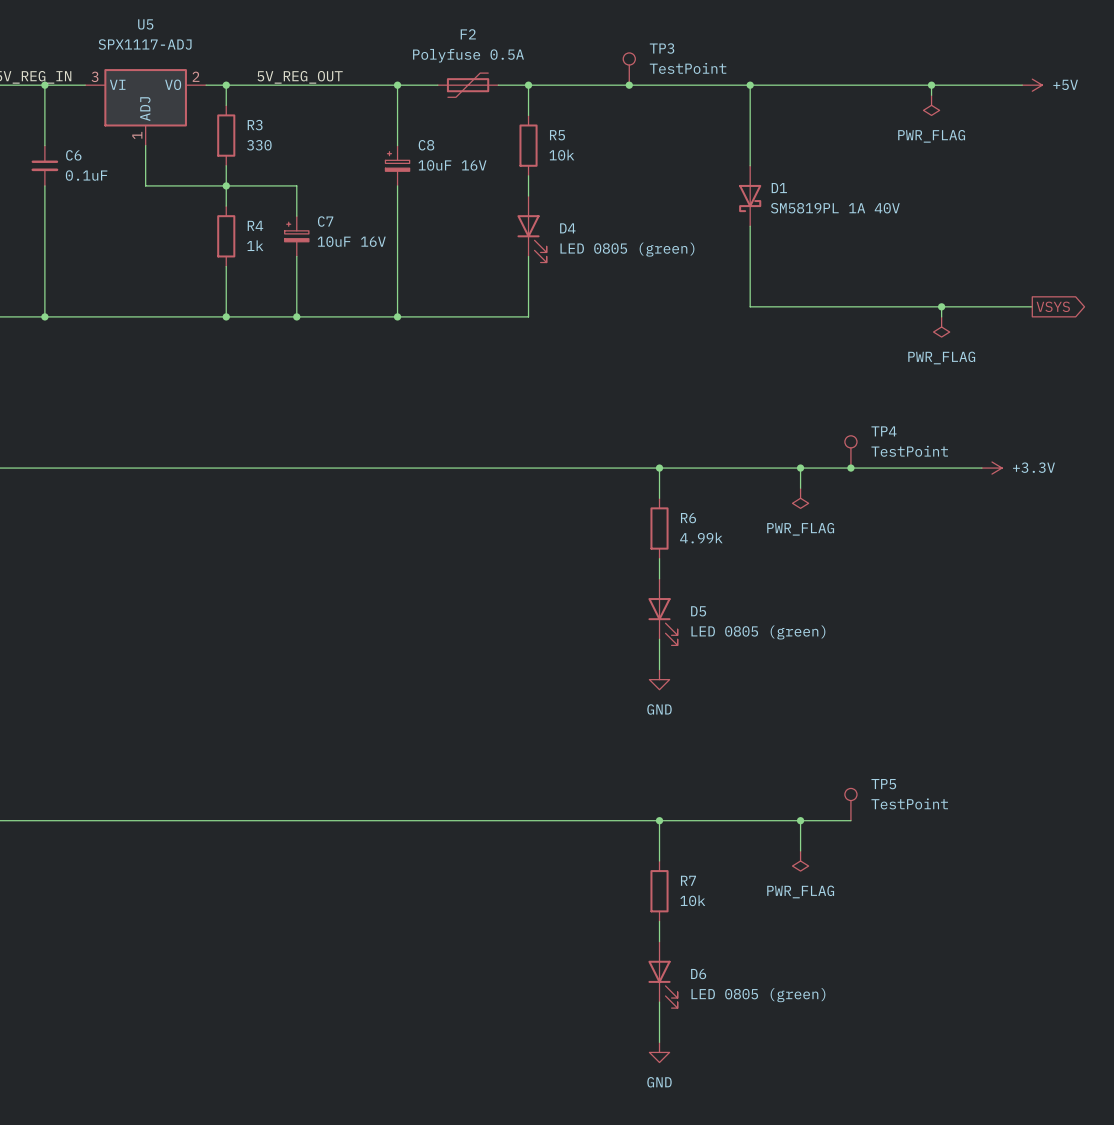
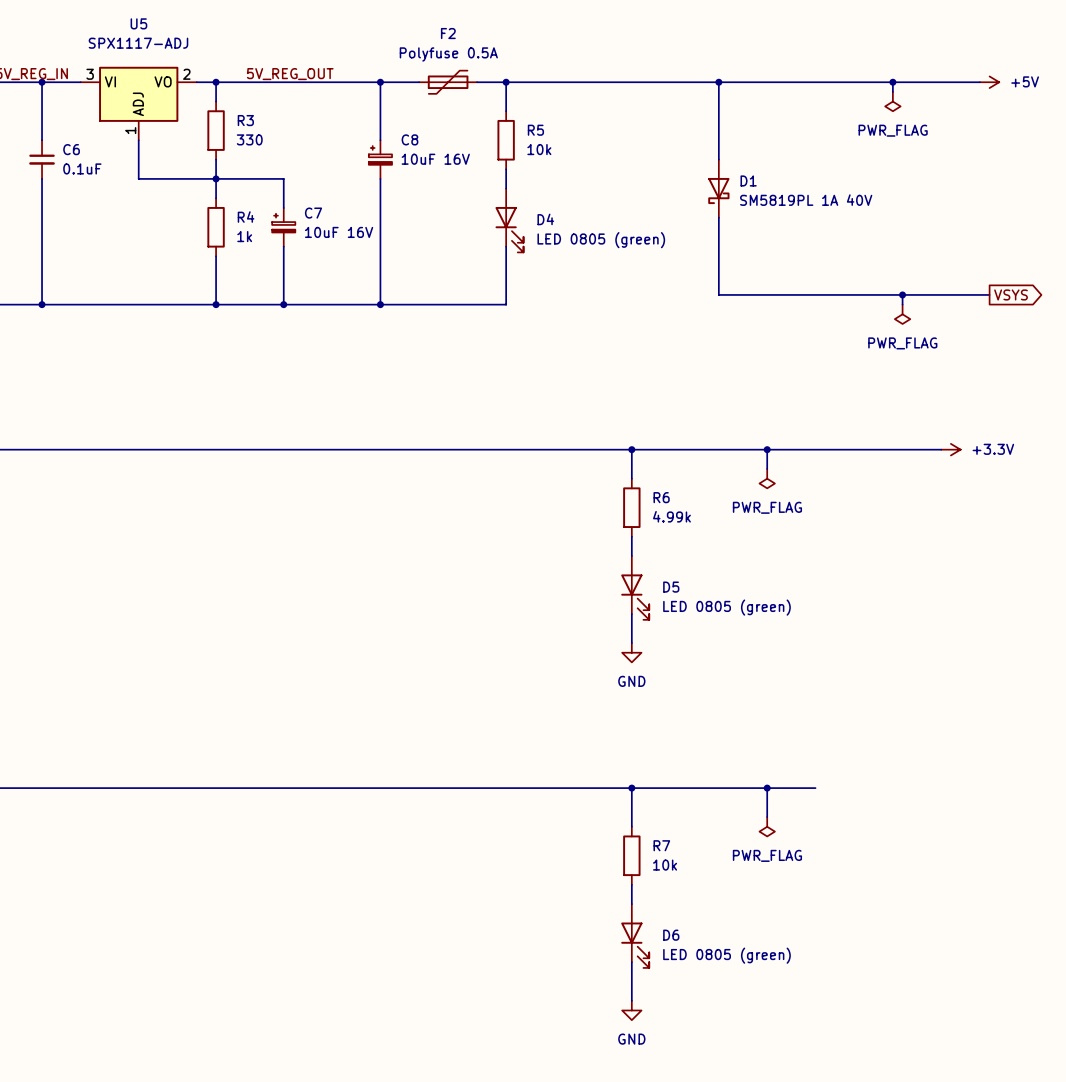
TP3: TestPoint (629, 69) -> none
junction: (629, 85) -> none
TP4: TestPoint (850, 451) -> none
junction: (850, 468) -> none
TP5: TestPoint (850, 804) -> none

